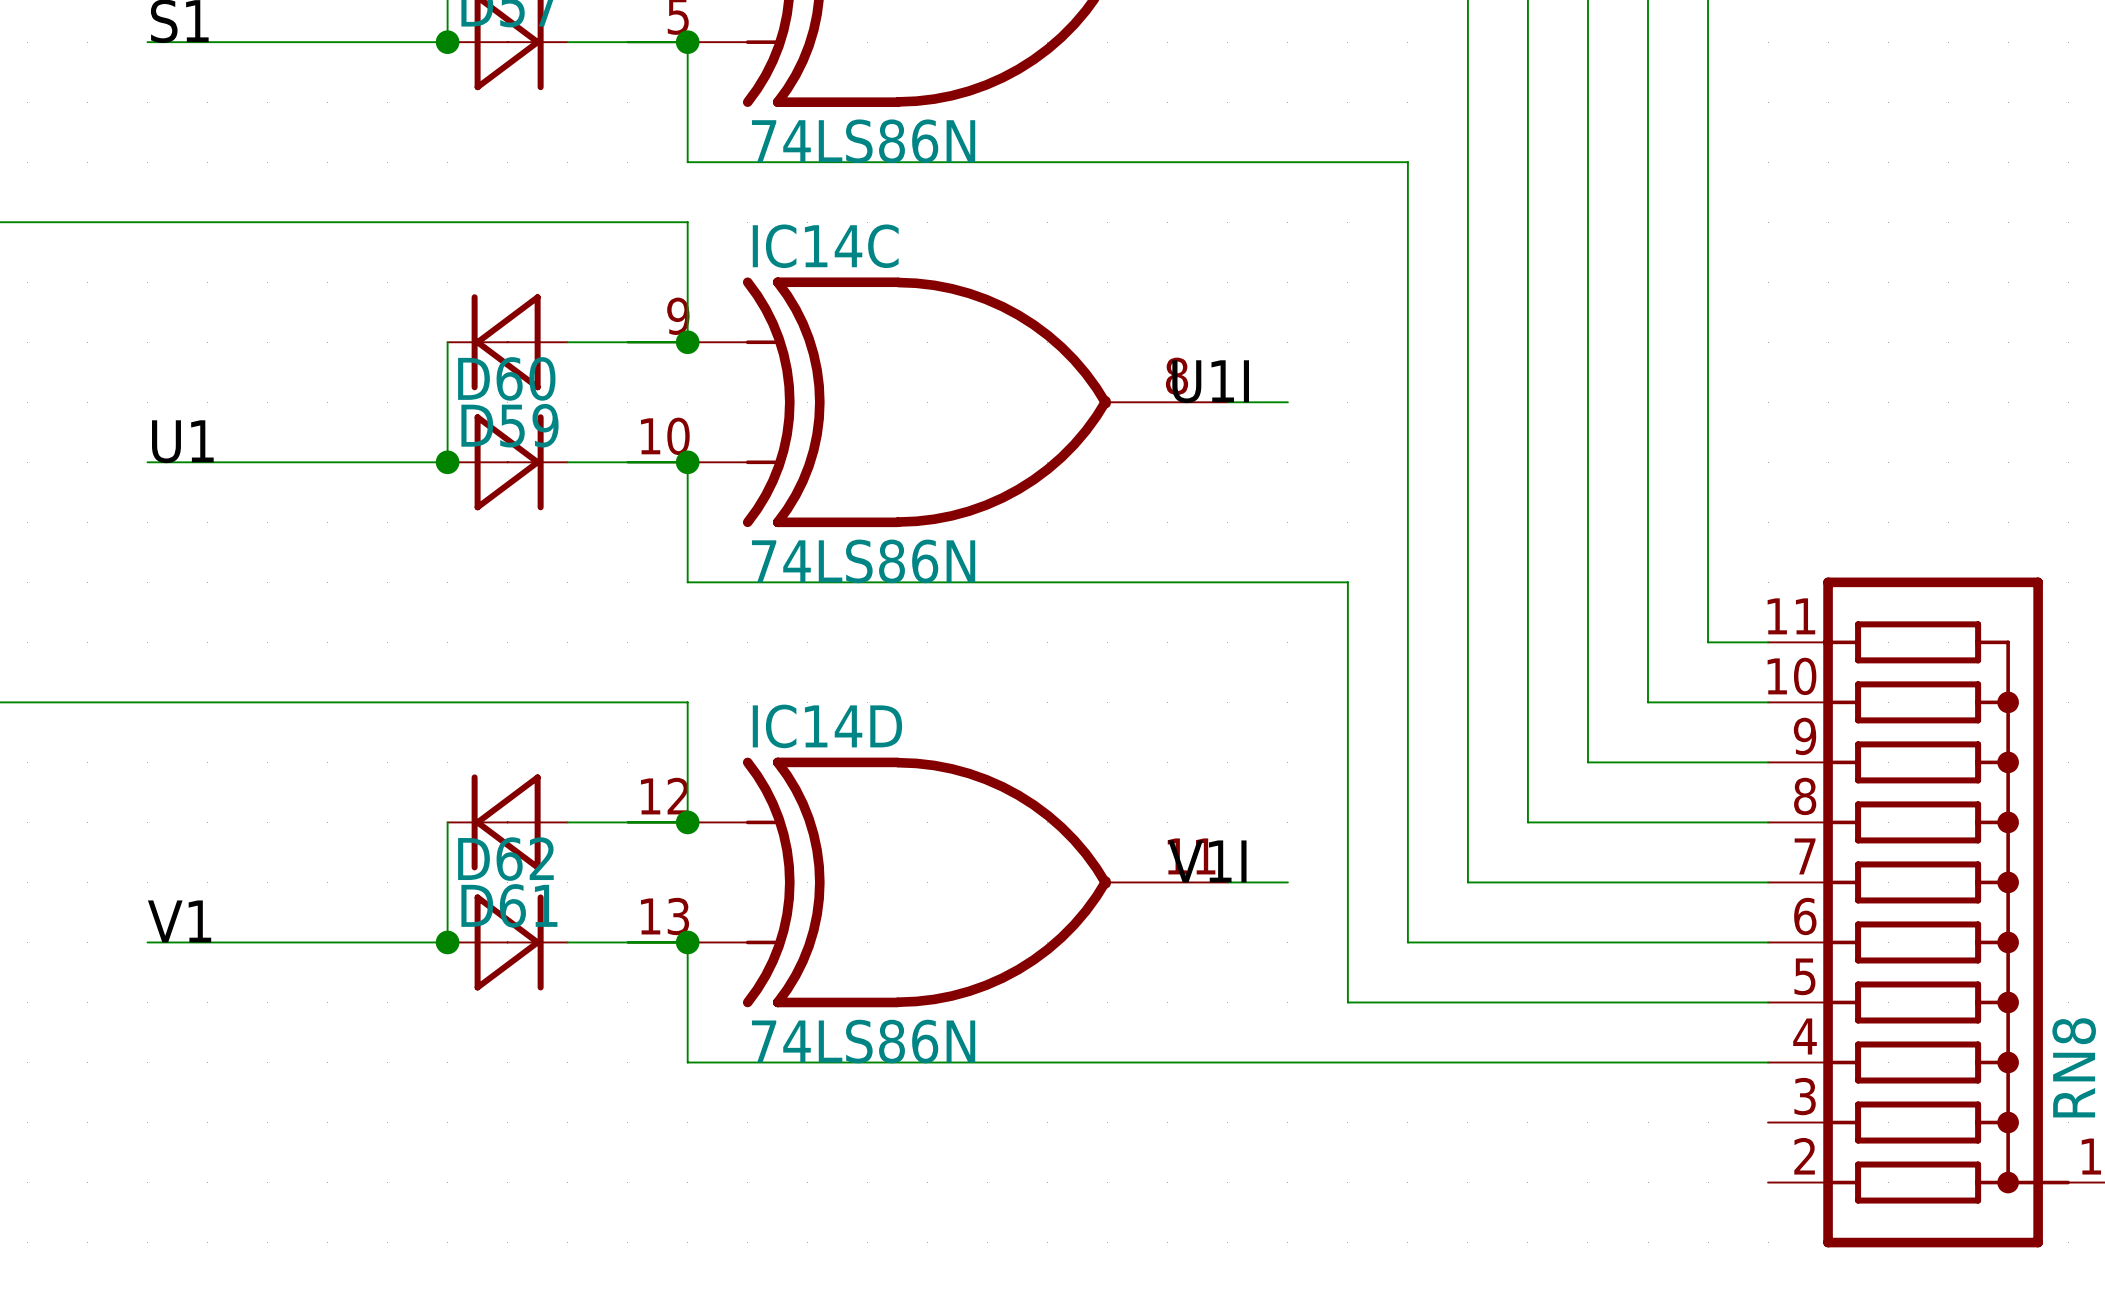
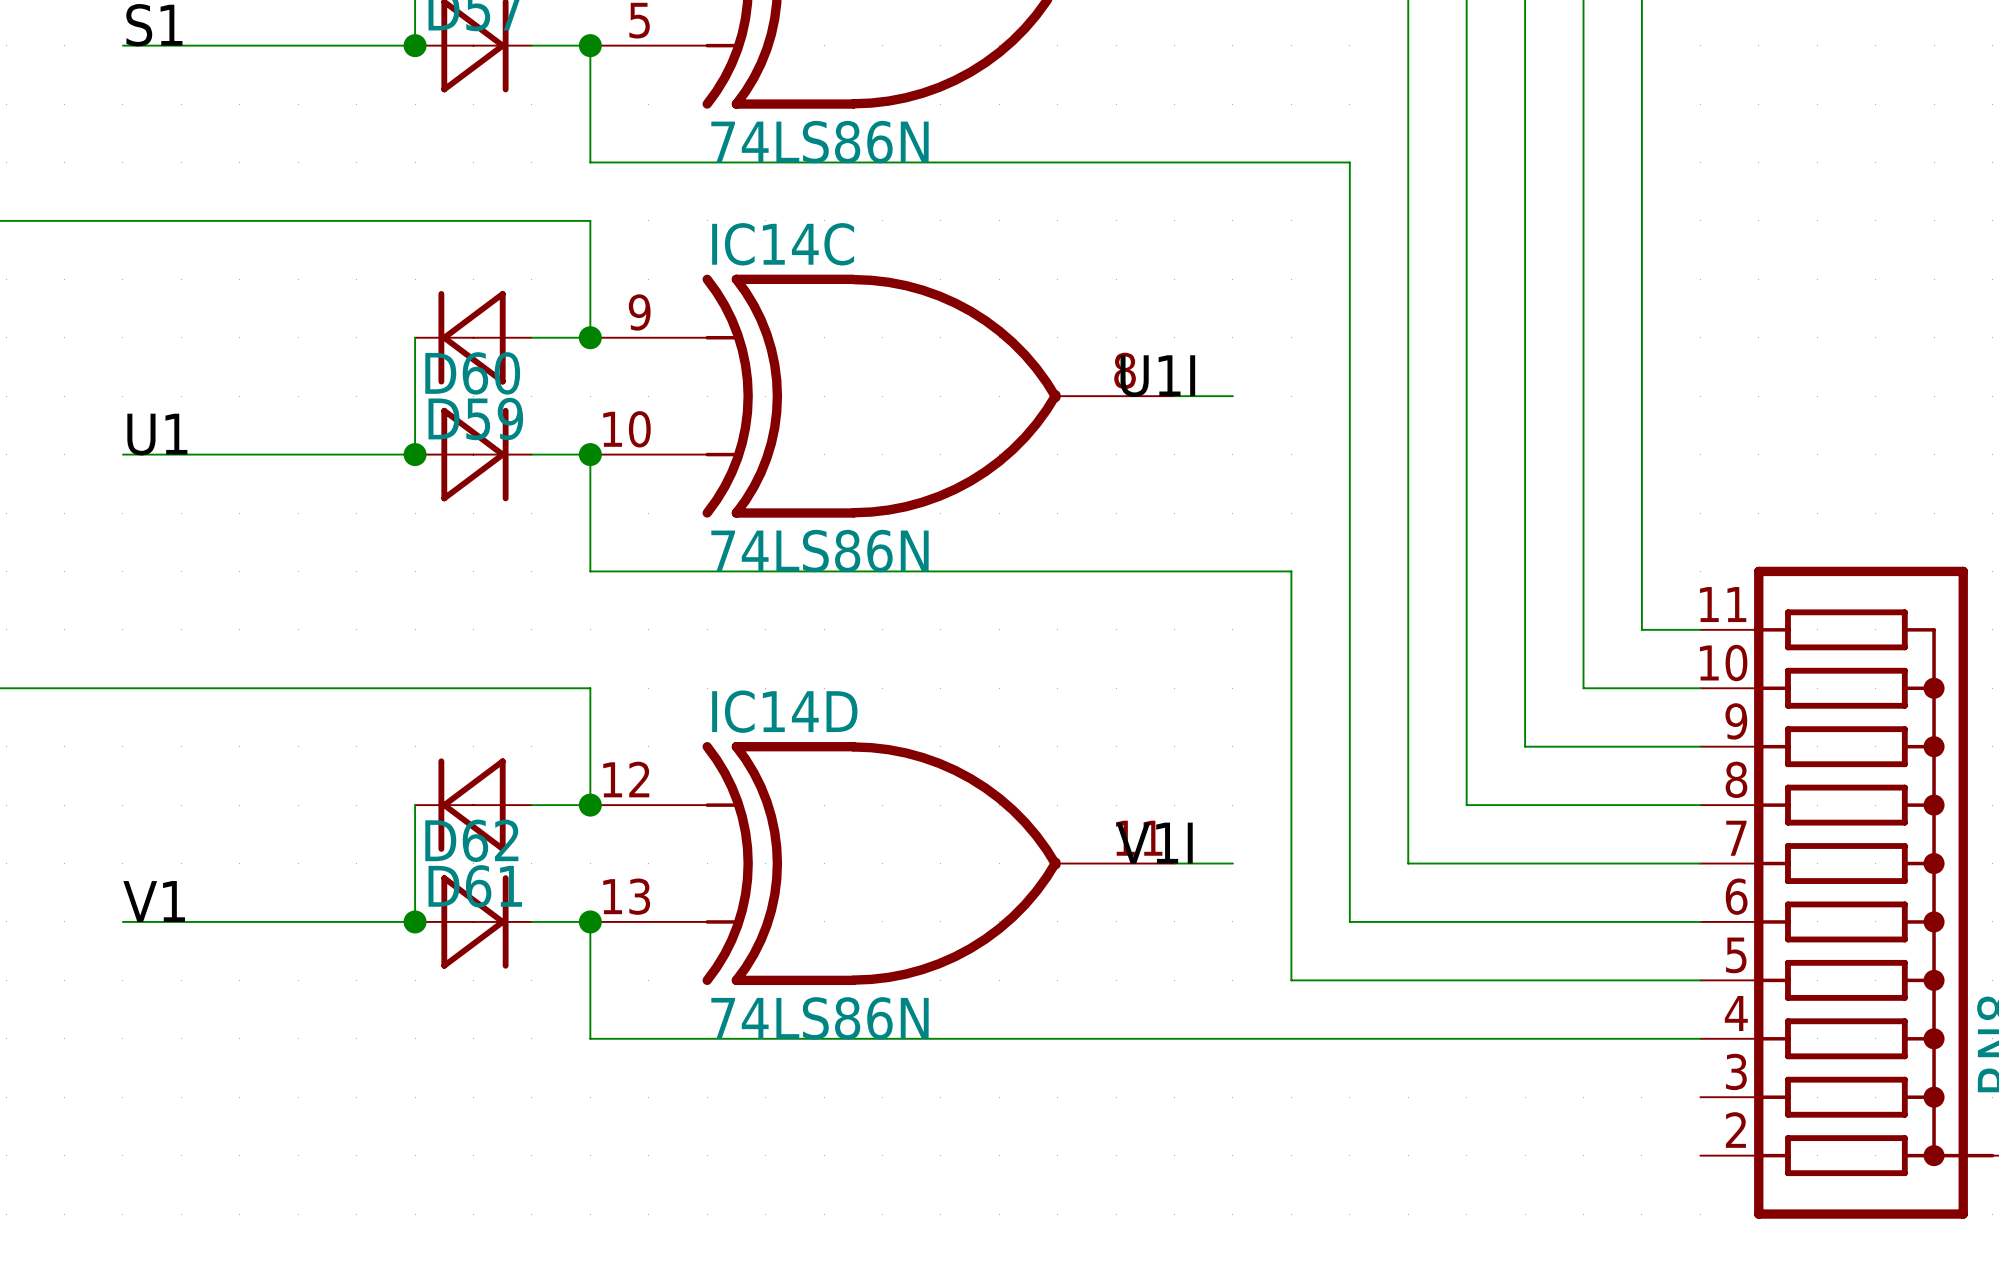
wire: (627, 42) (687, 42) (687, 162) -> (590, 45) (590, 162) (648, 162)
junction position: (687, 42) -> (590, 45)
wire: (627, 222) (687, 222) (687, 342) (627, 342) -> (590, 220) (590, 337)
junction position: (687, 342) -> (590, 337)
wire: (627, 462) (687, 462) (687, 582) -> (590, 454) (590, 571) (648, 571)
junction position: (687, 462) -> (590, 454)
wire: (627, 702) (687, 702) (687, 822) (627, 822) -> (590, 688) (590, 805)
junction position: (687, 822) -> (590, 805)
wire: (627, 942) (687, 942) (687, 1062) -> (590, 921) (590, 1038) (648, 1038)
junction position: (687, 942) -> (590, 921)

